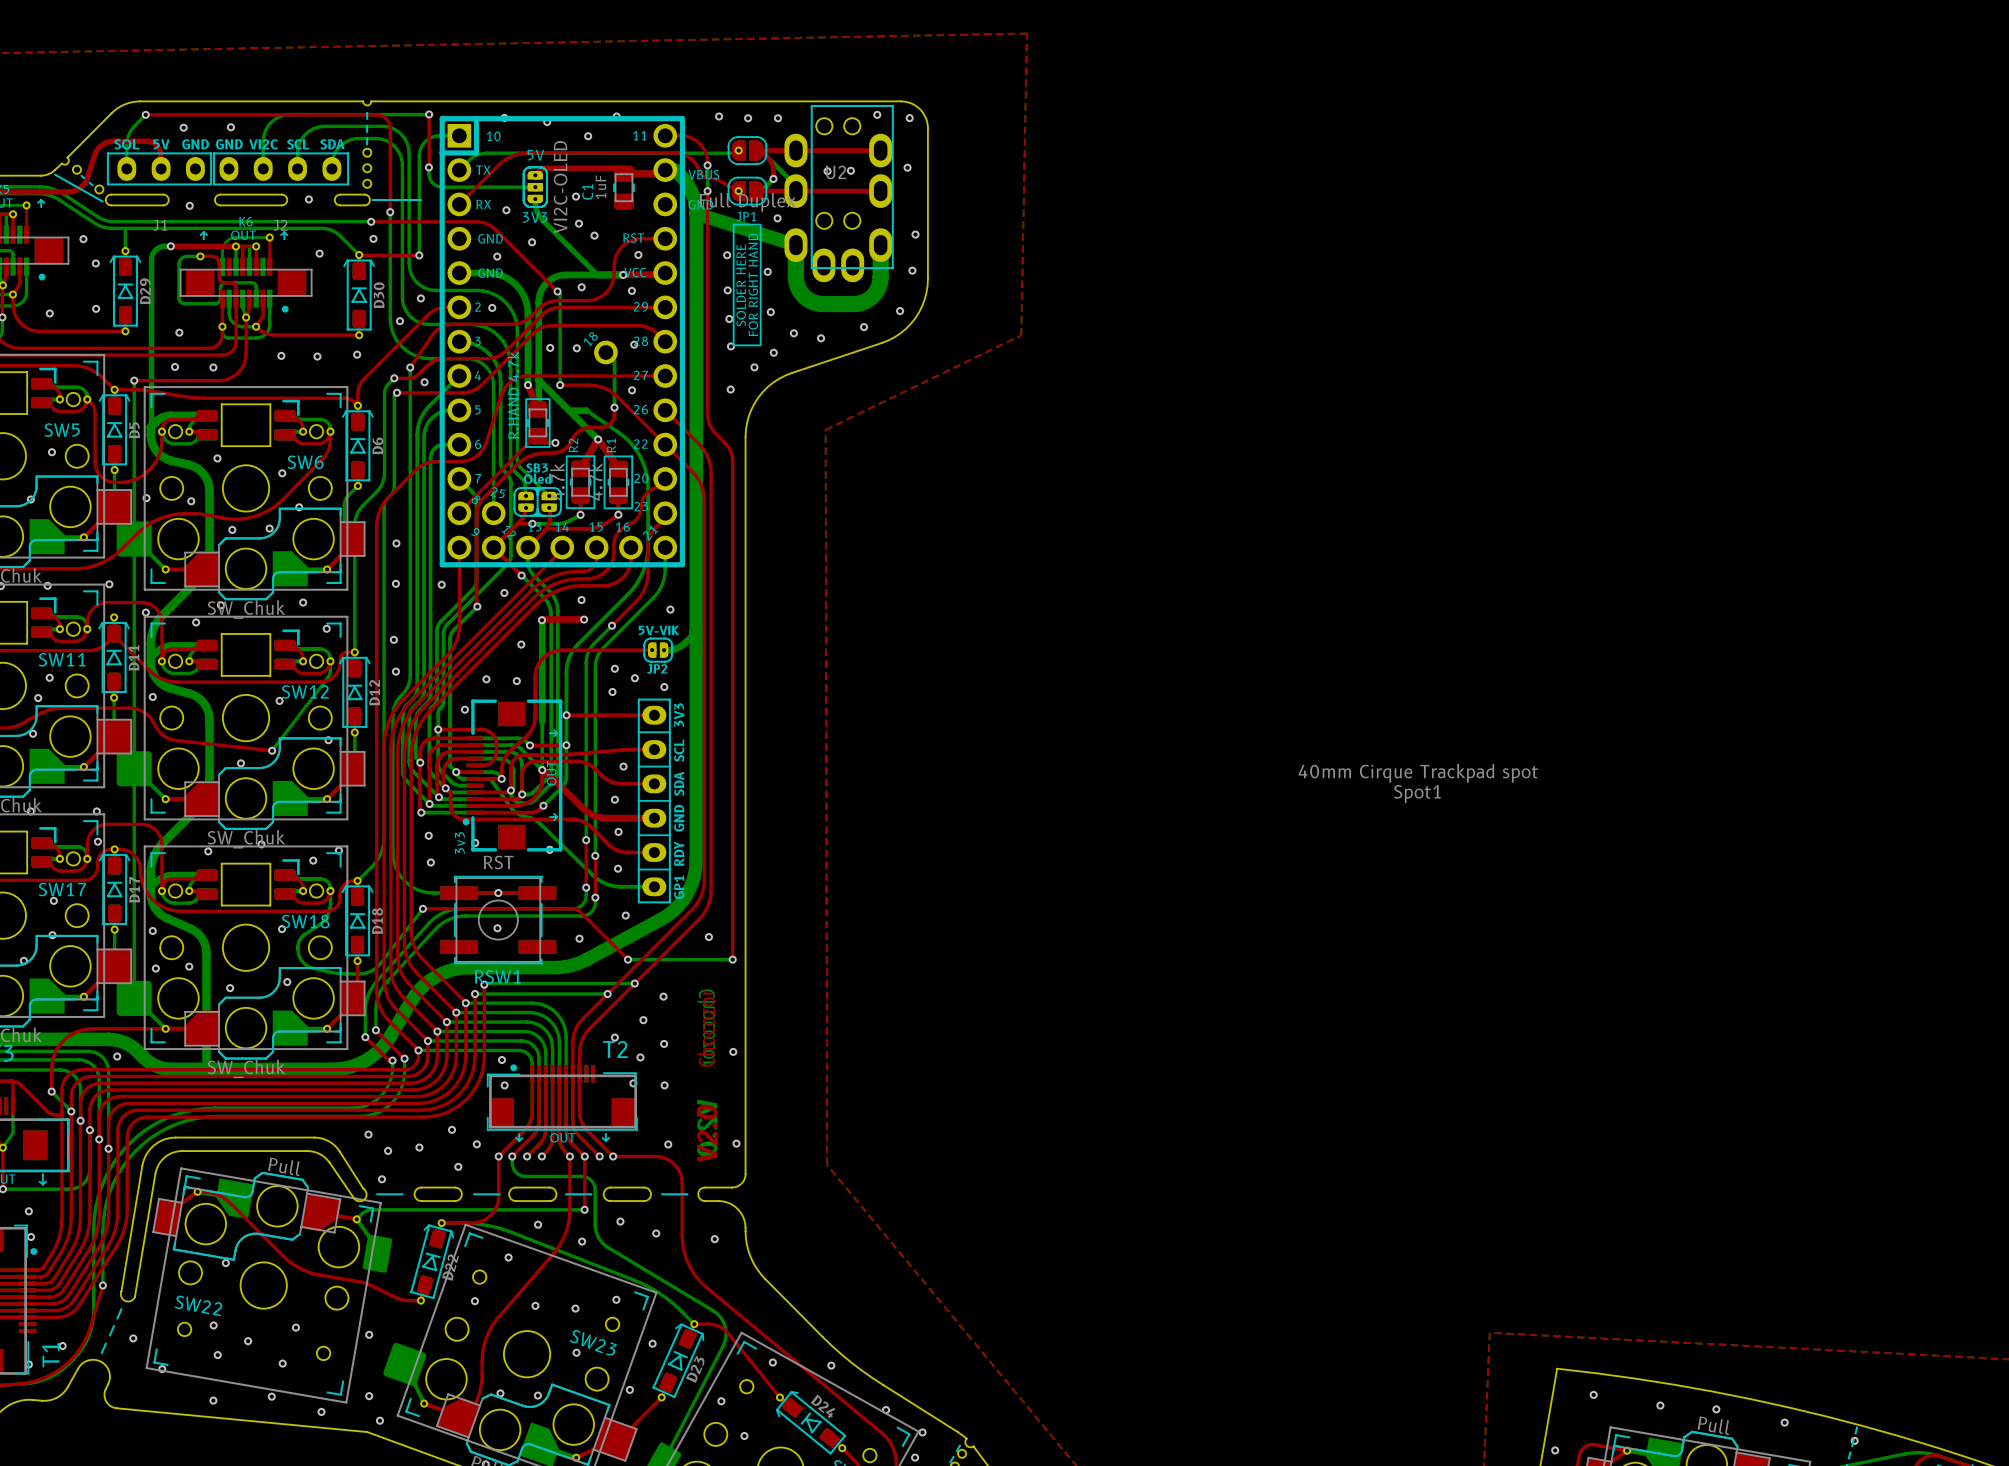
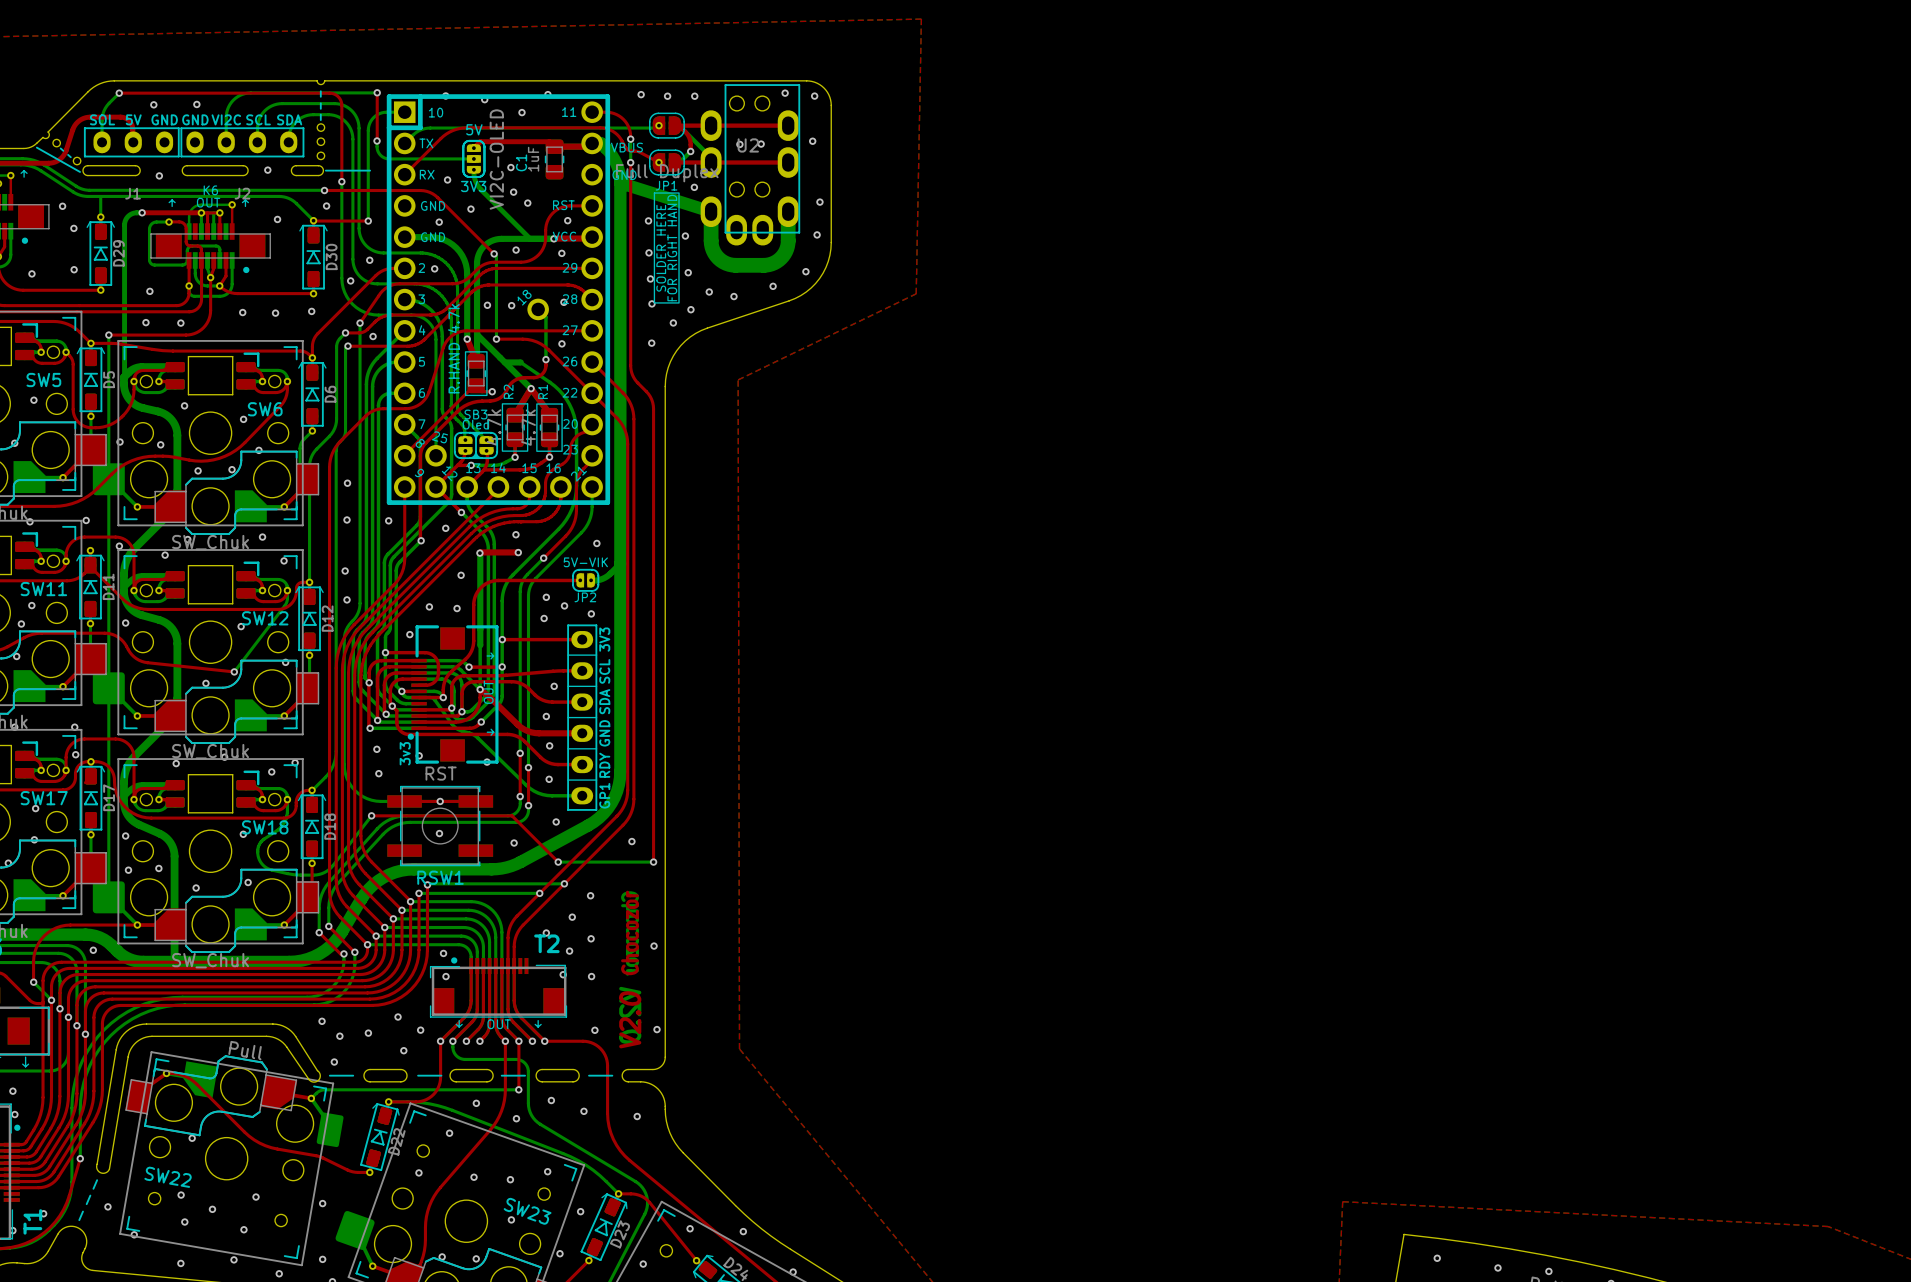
Spot1: 40mm Cirque Trackpad spot (1418, 783) -> none

